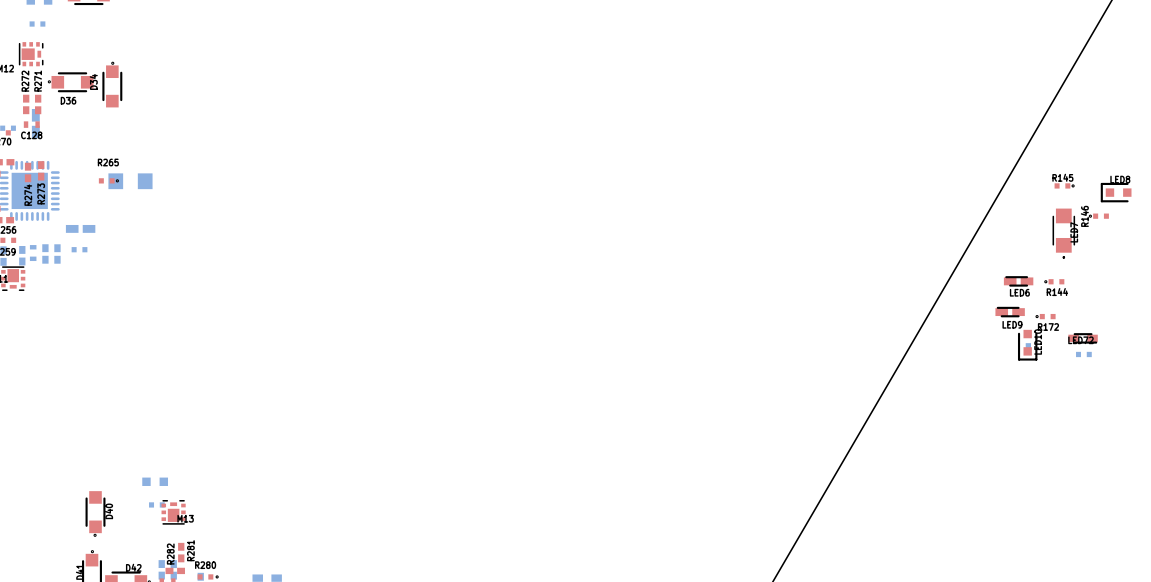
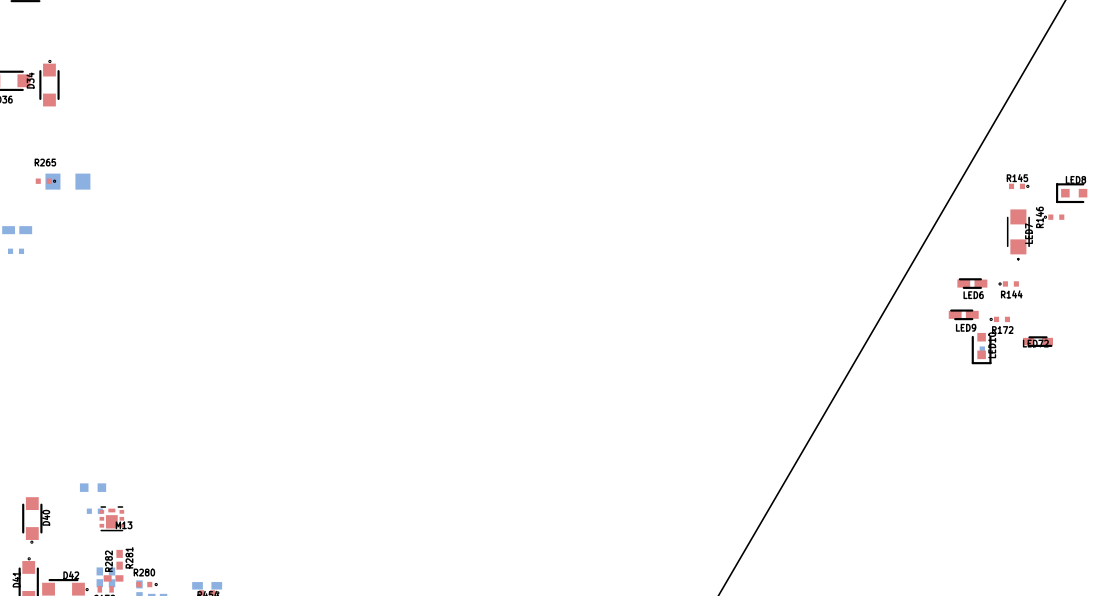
part: (1083, 354) -> none

